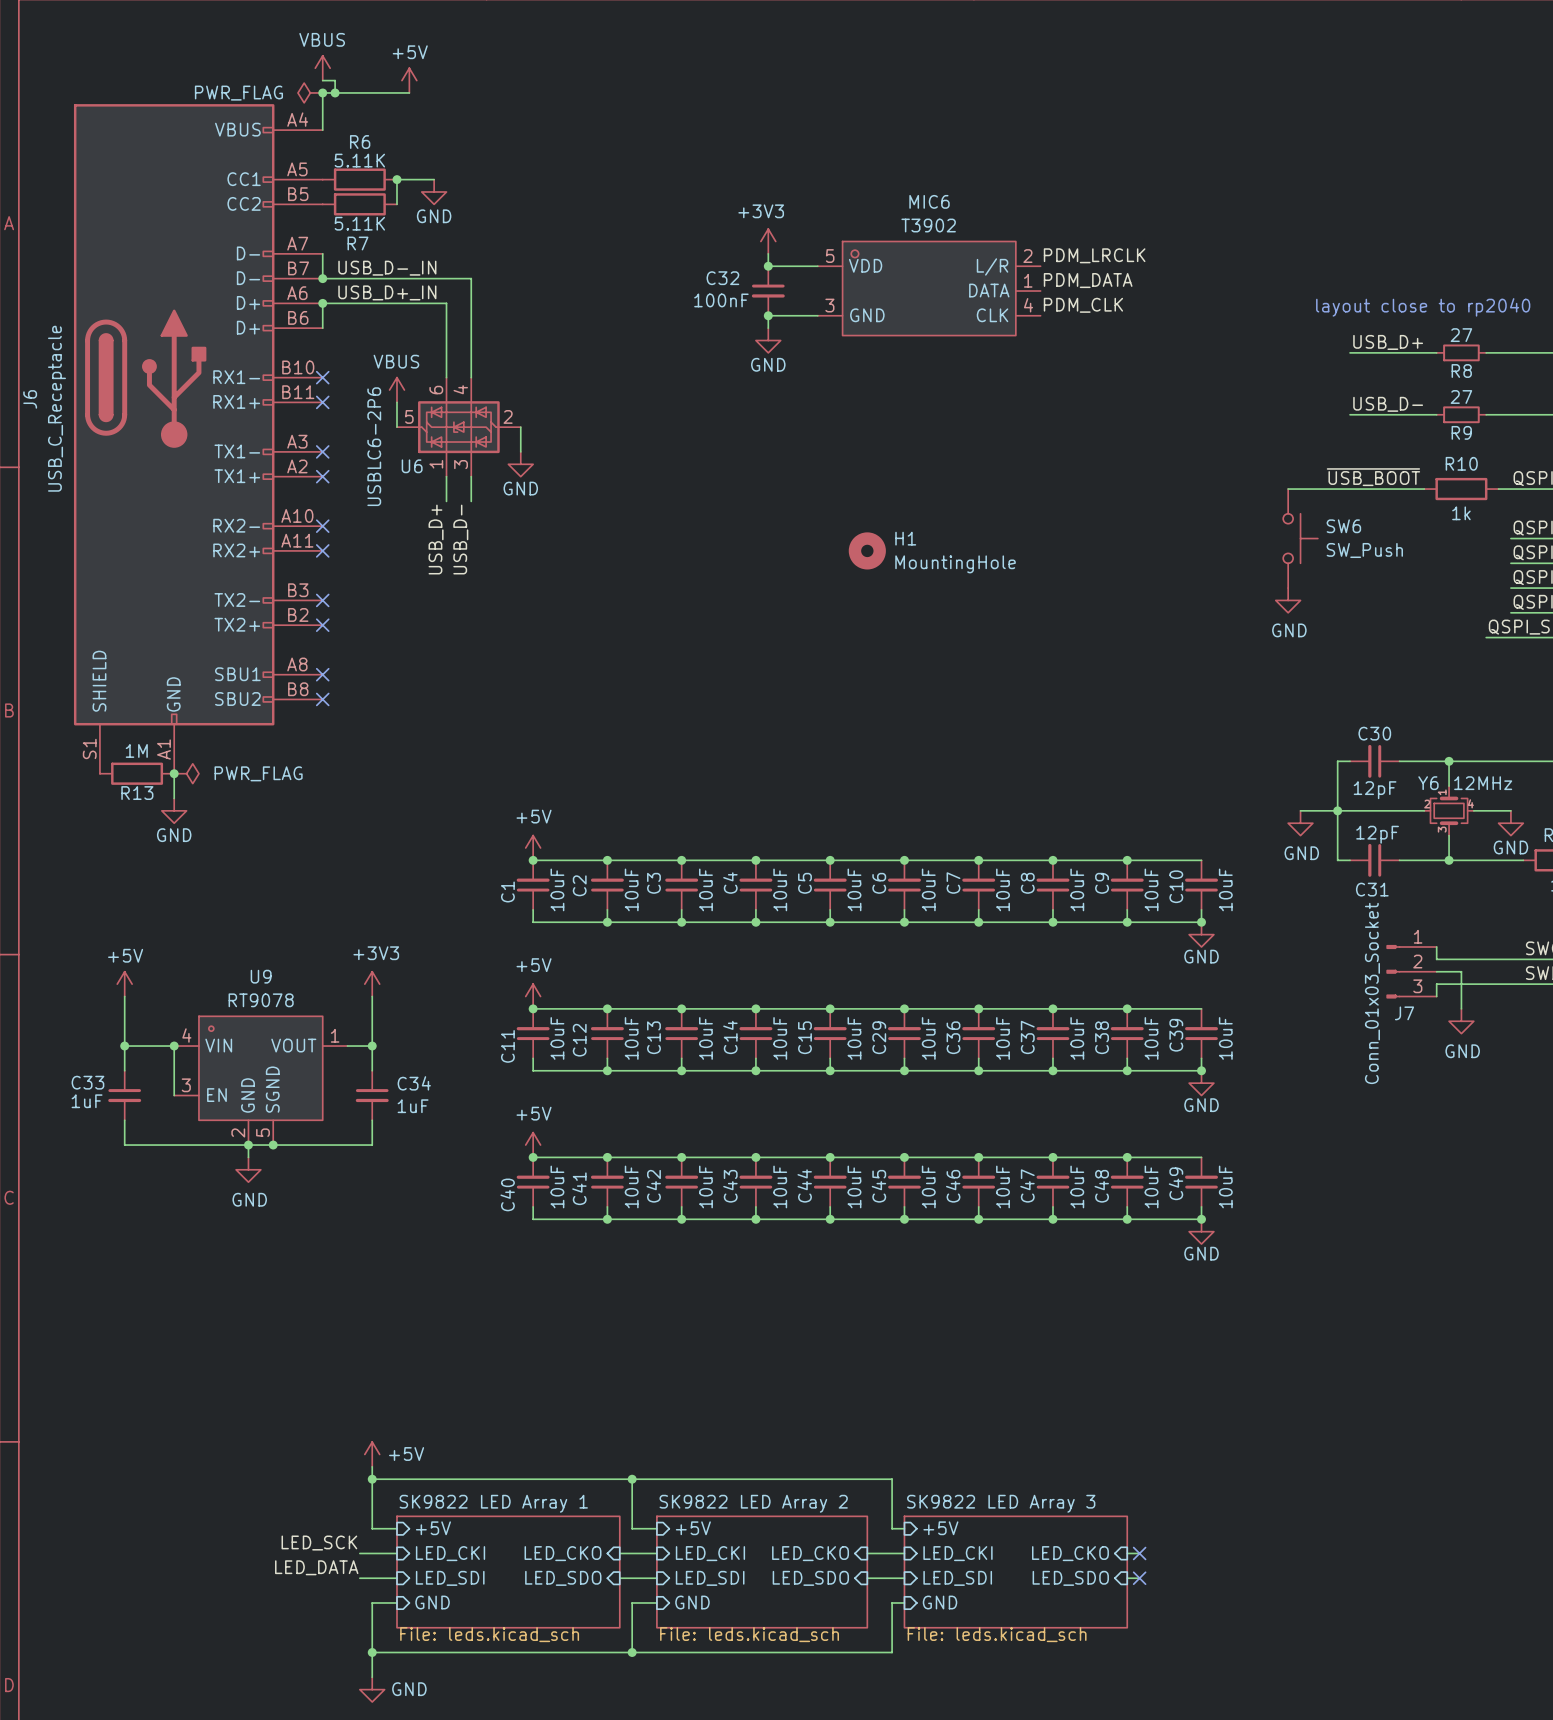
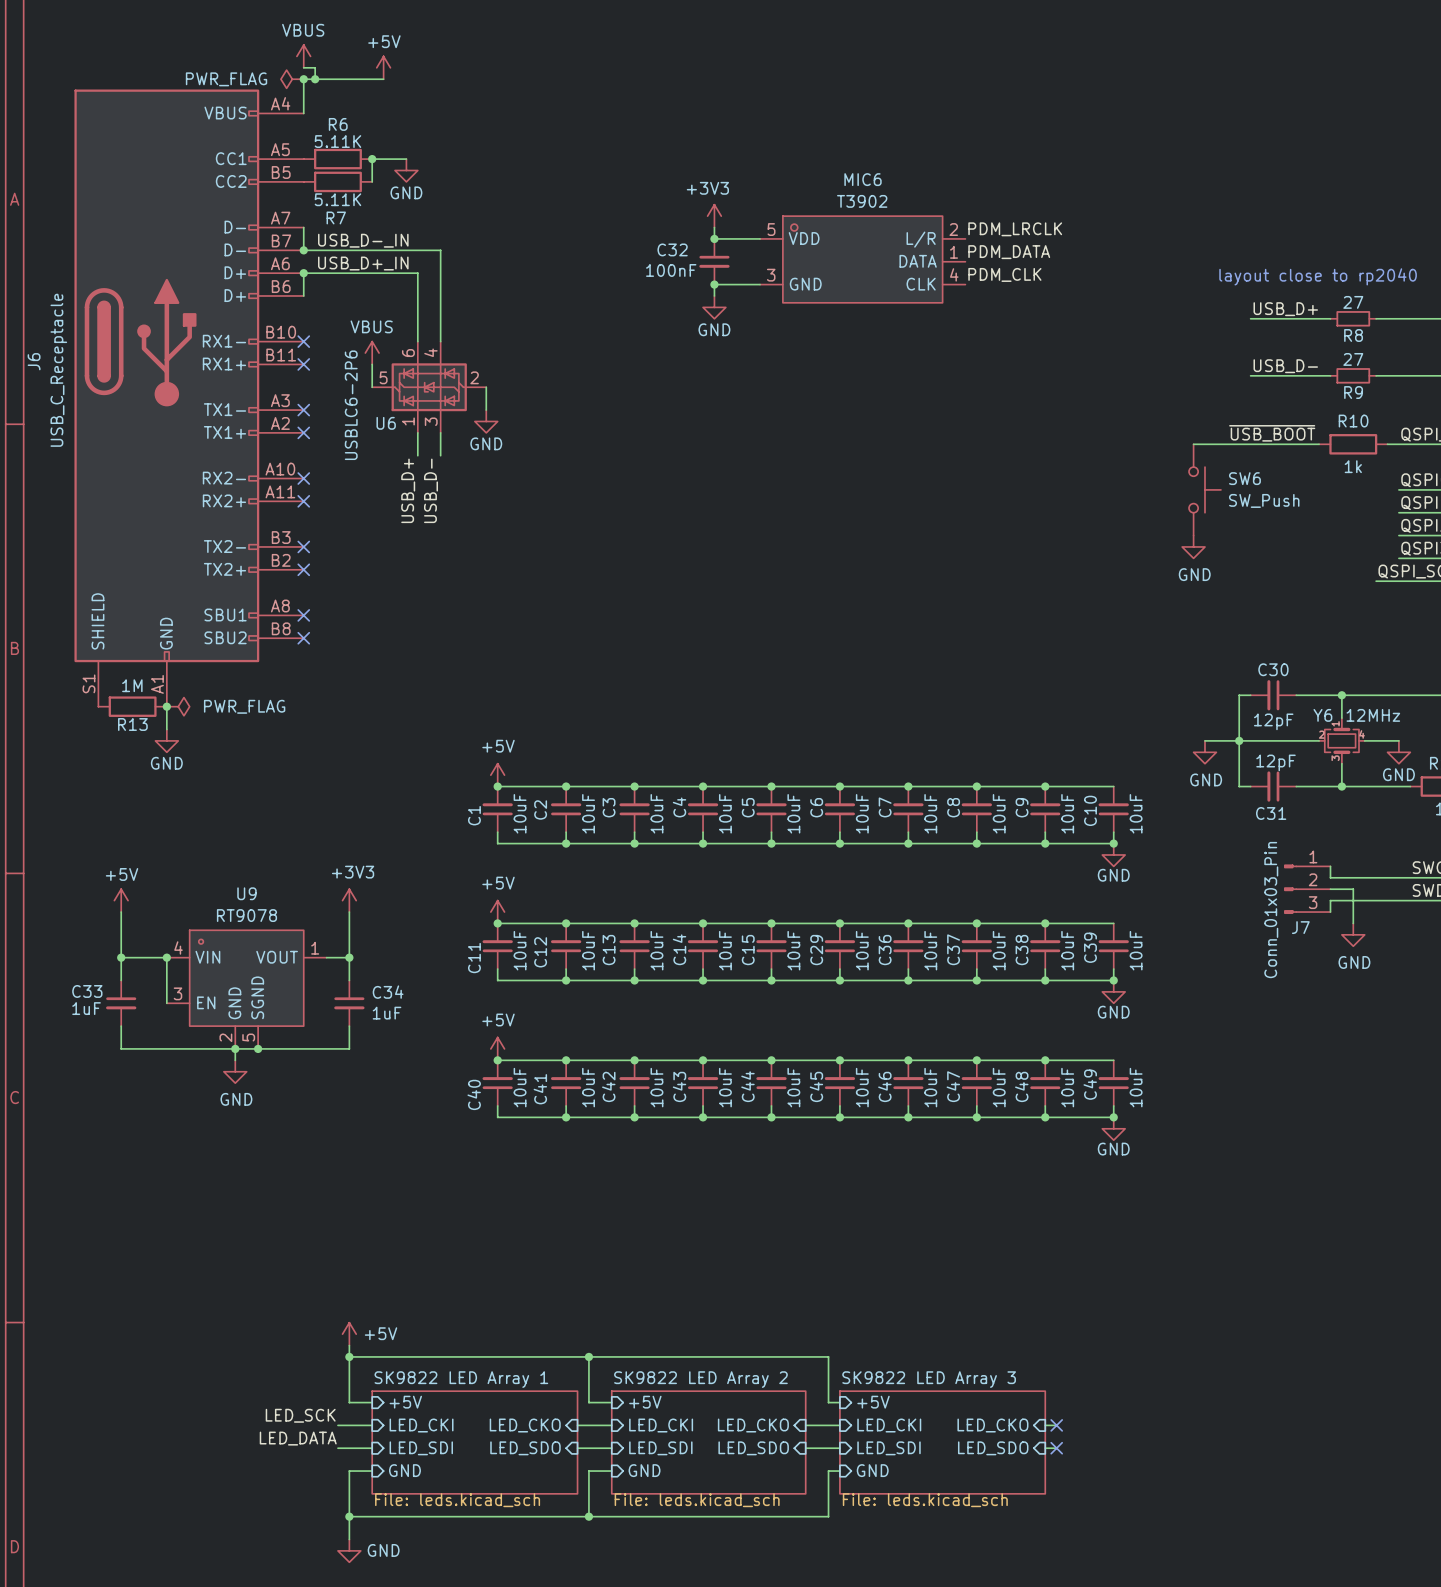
H1: MountingHole (867, 550) -> none
J7 value: Conn_01x03_Socket (1372, 993) -> Conn_01x03_Pin (1271, 910)

